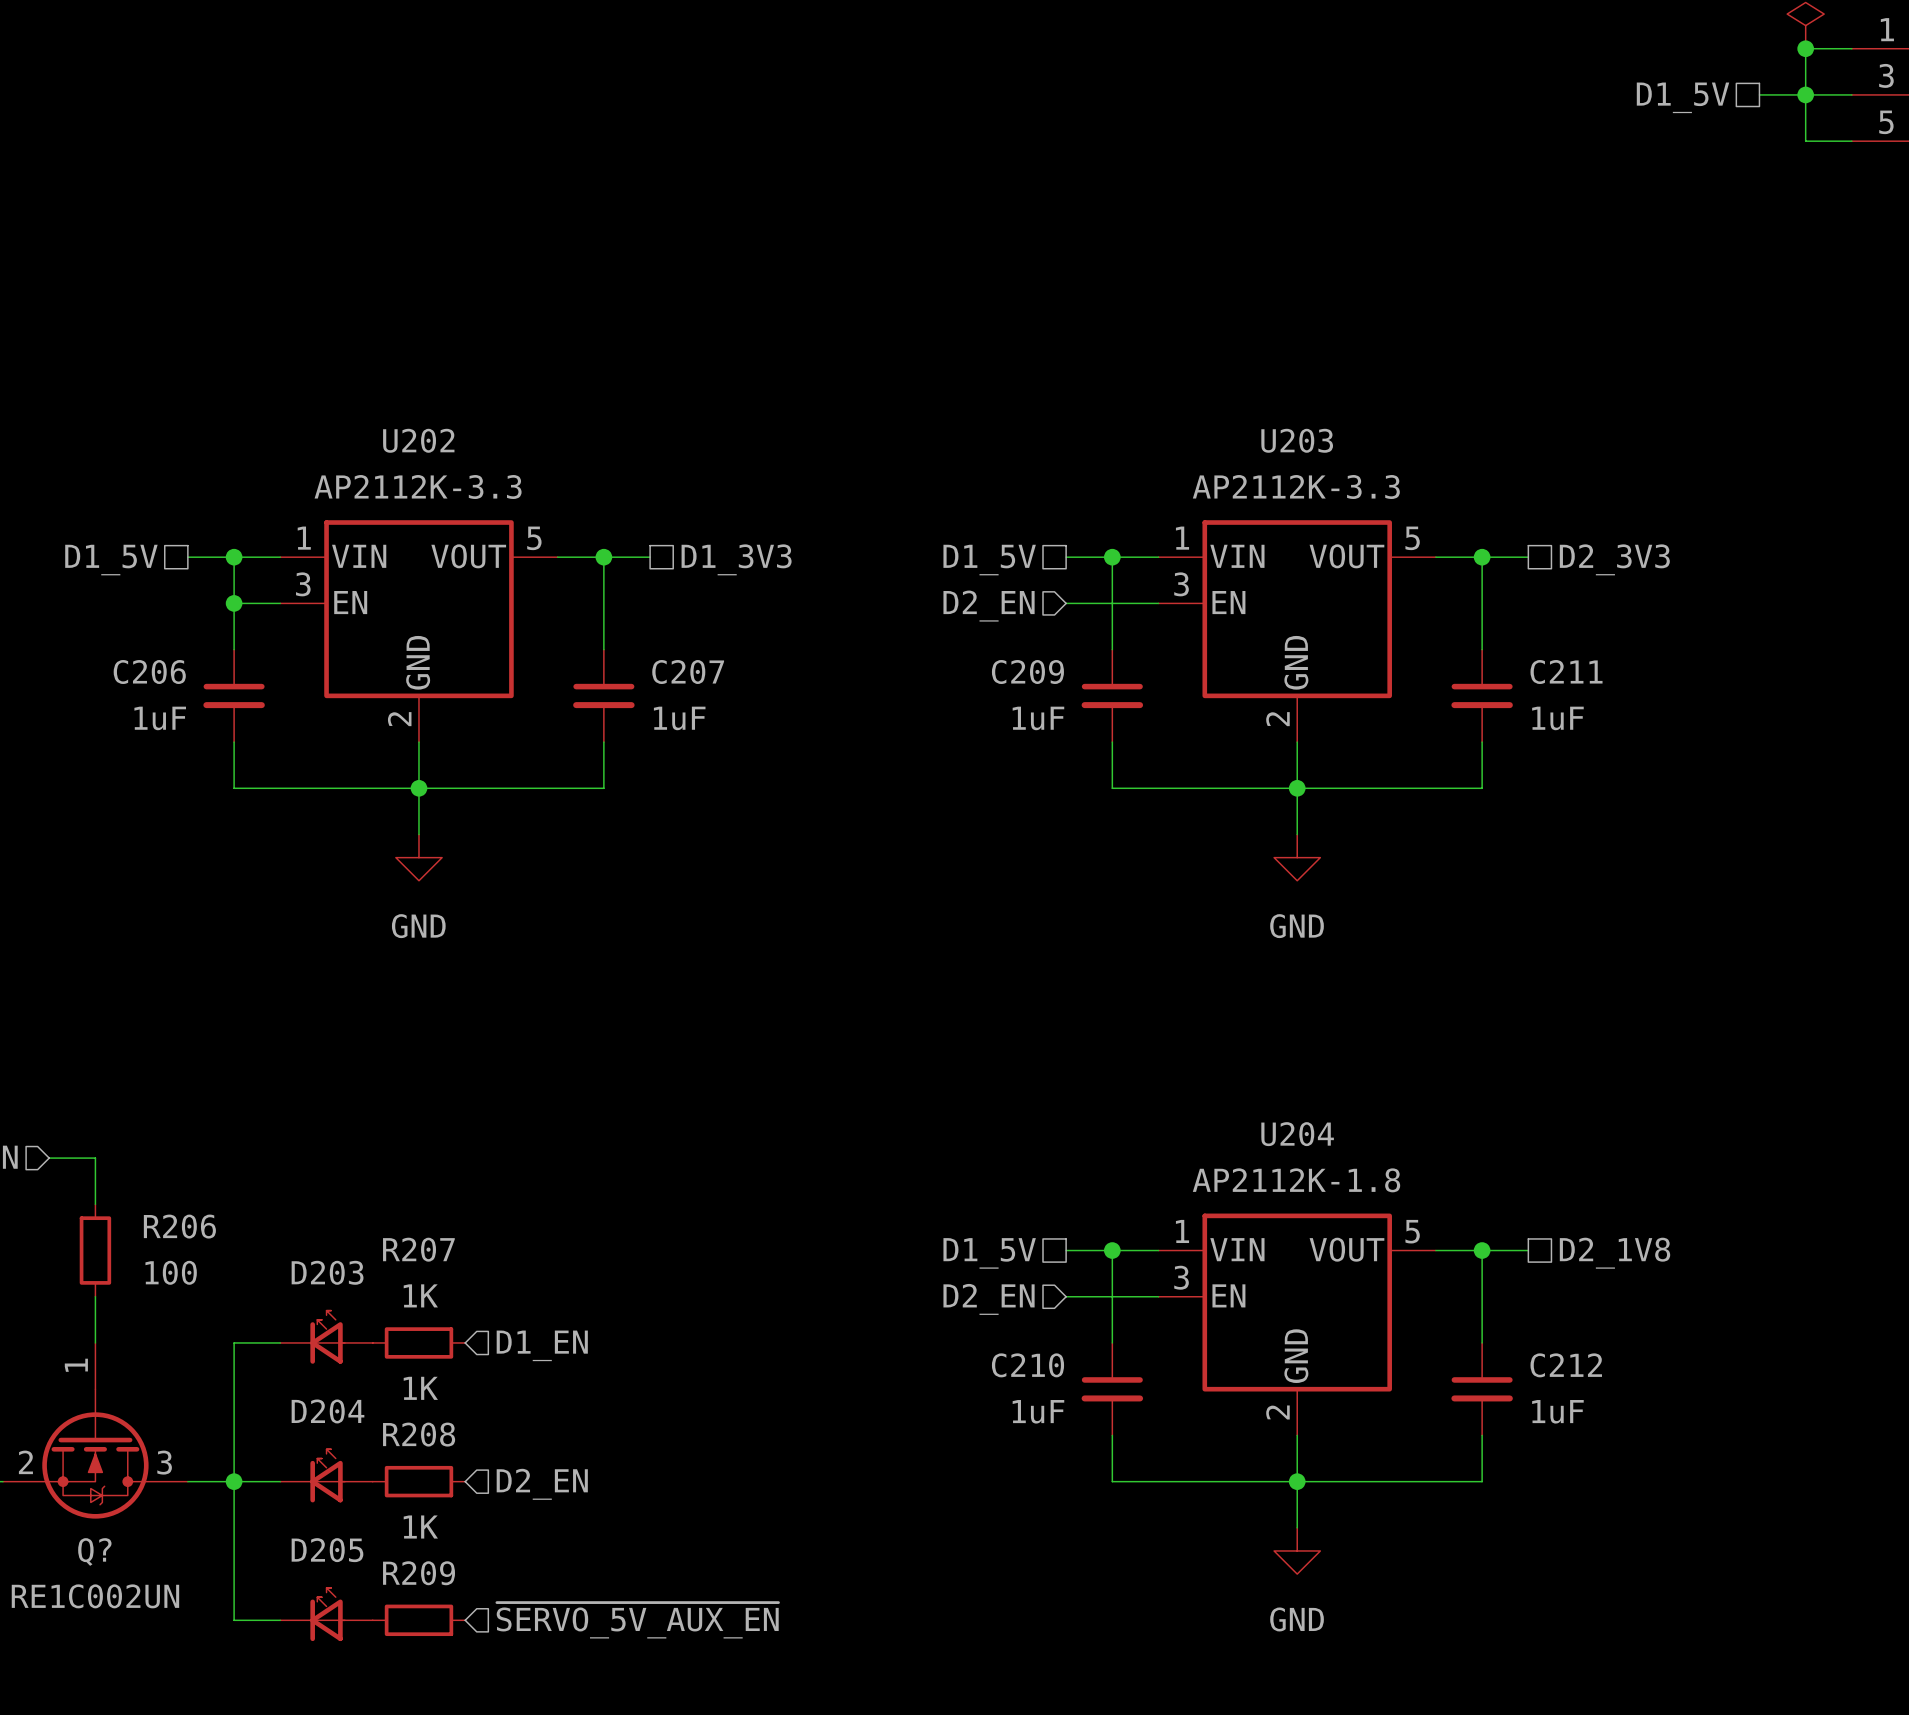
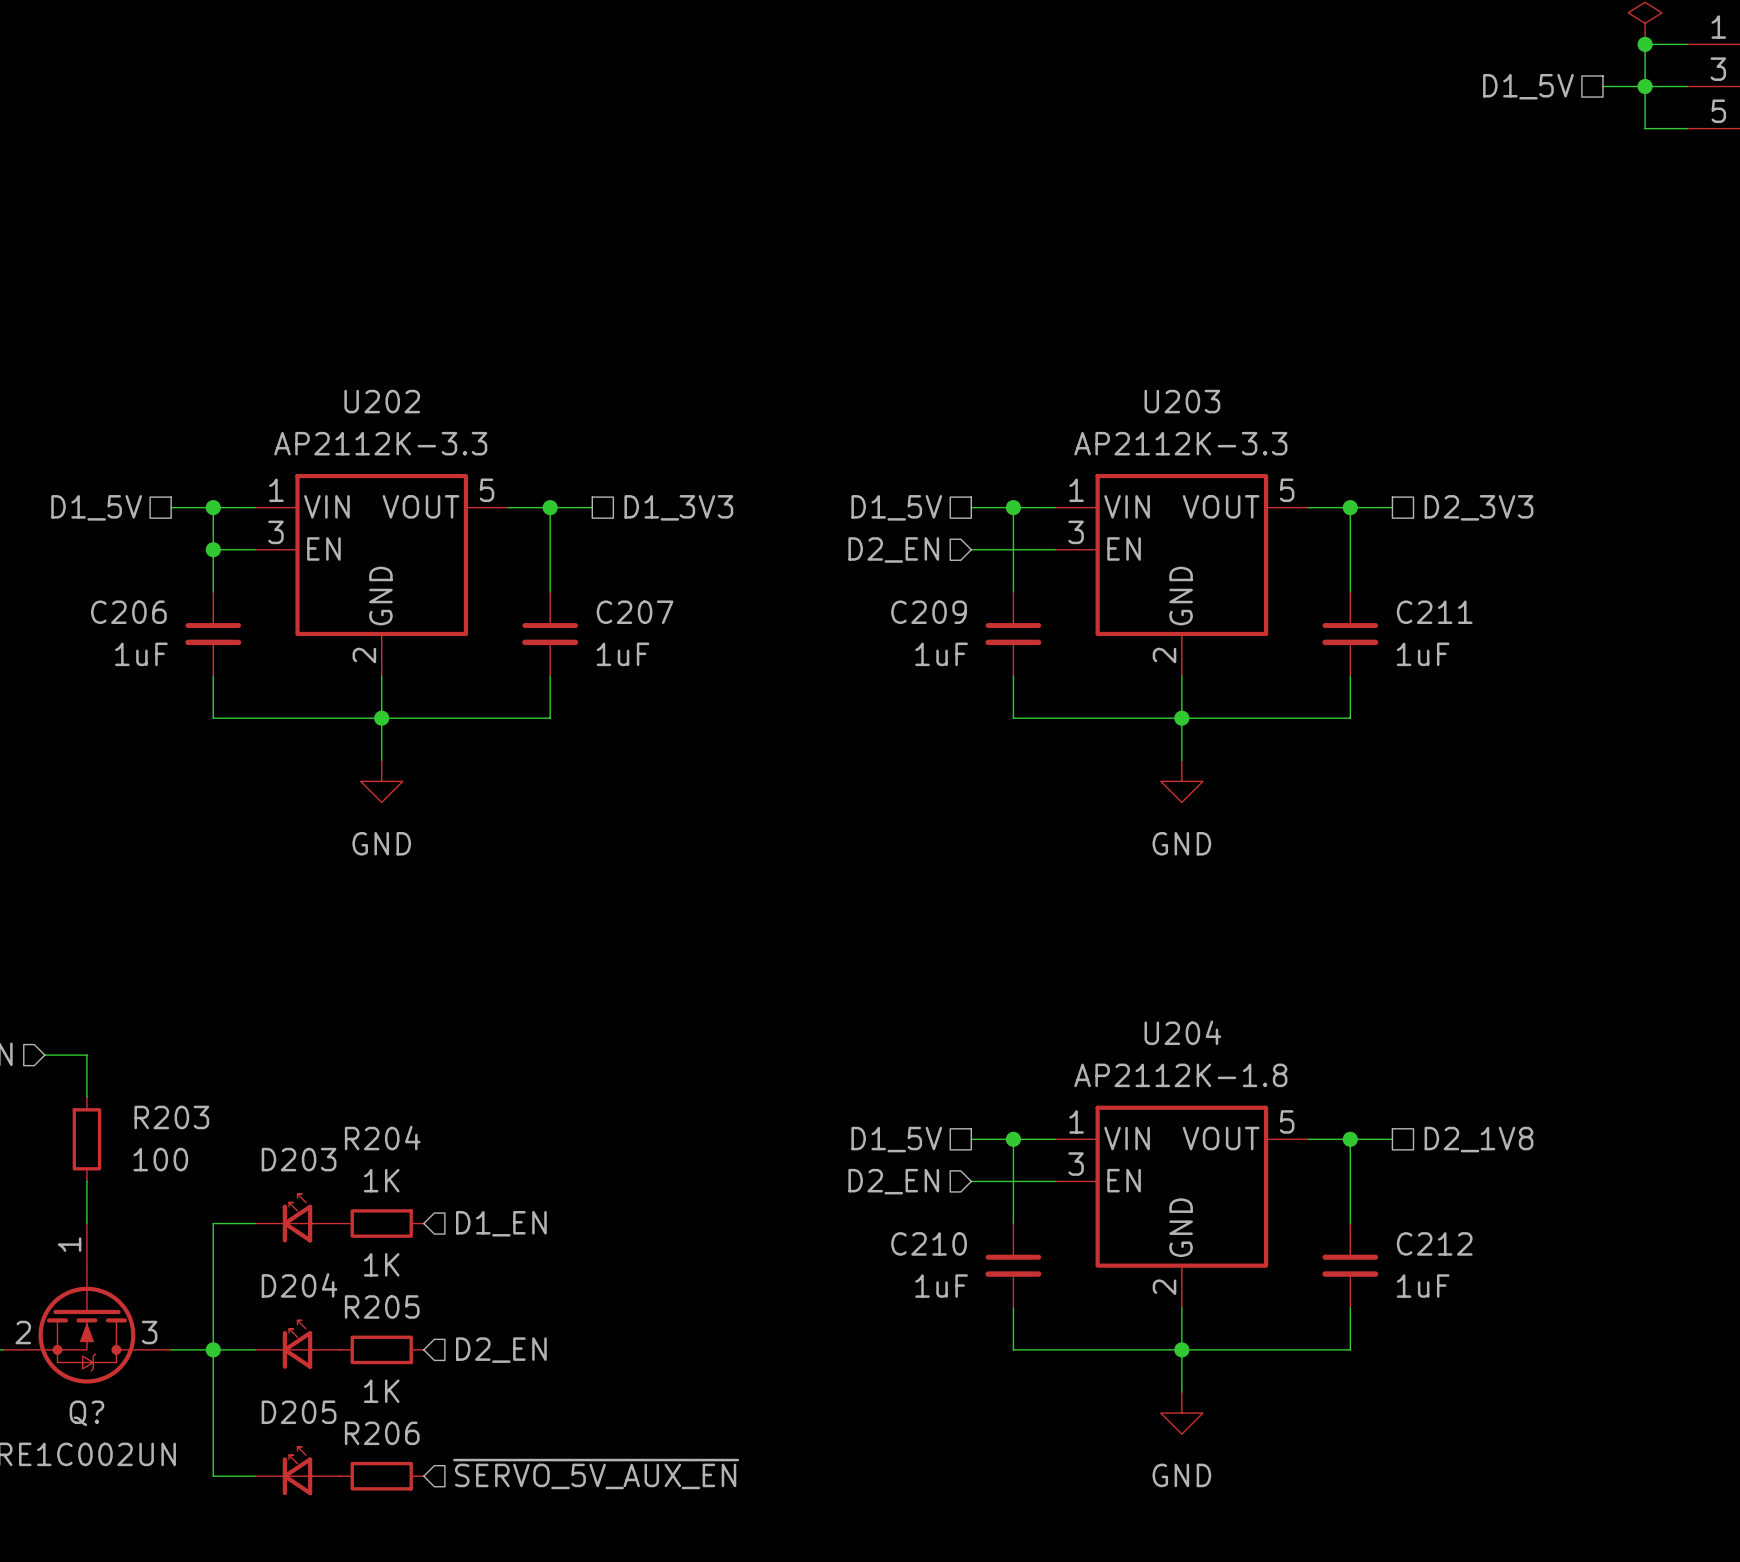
R206 name: R206 (179, 1226) -> R203 (171, 1117)
R207 name: R207 (418, 1249) -> R204 (382, 1138)
R208 name: R208 (419, 1434) -> R205 (382, 1306)
R209 name: R209 (419, 1573) -> R206 (382, 1433)

